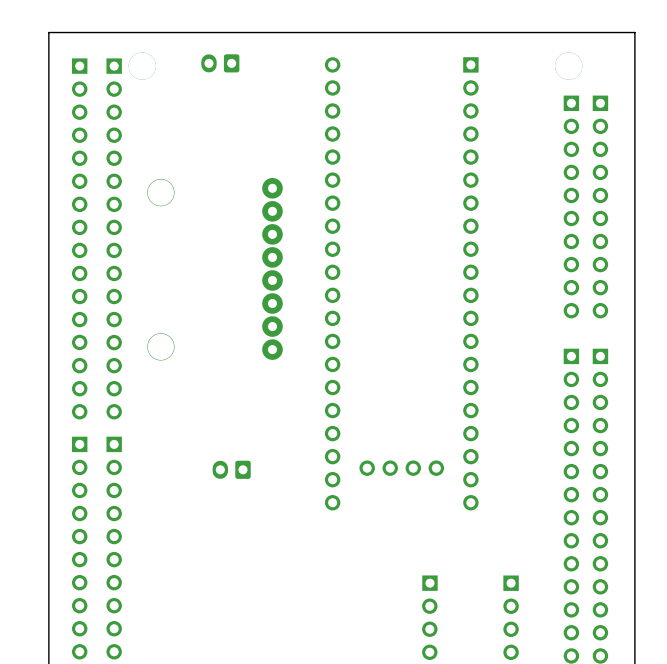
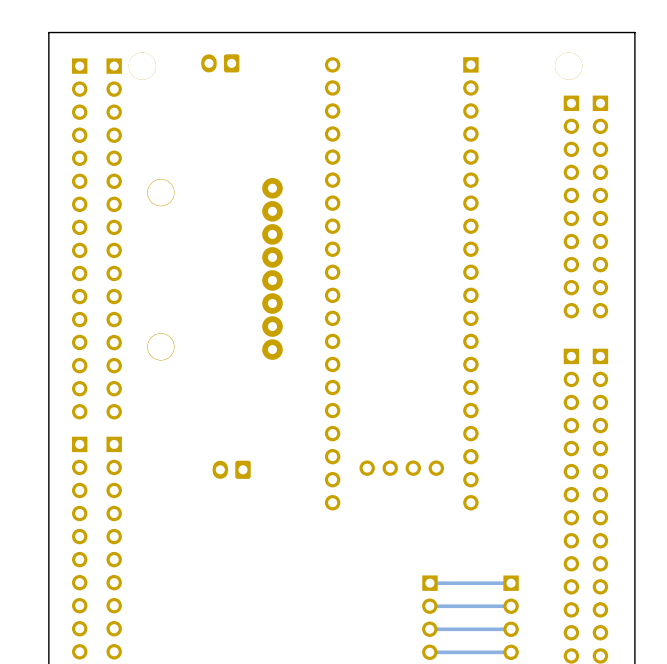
track: none -> (511, 583) (430, 583)
track: none -> (511, 606) (429, 606)
track: none -> (511, 629) (429, 629)
track: none -> (511, 652) (429, 652)

